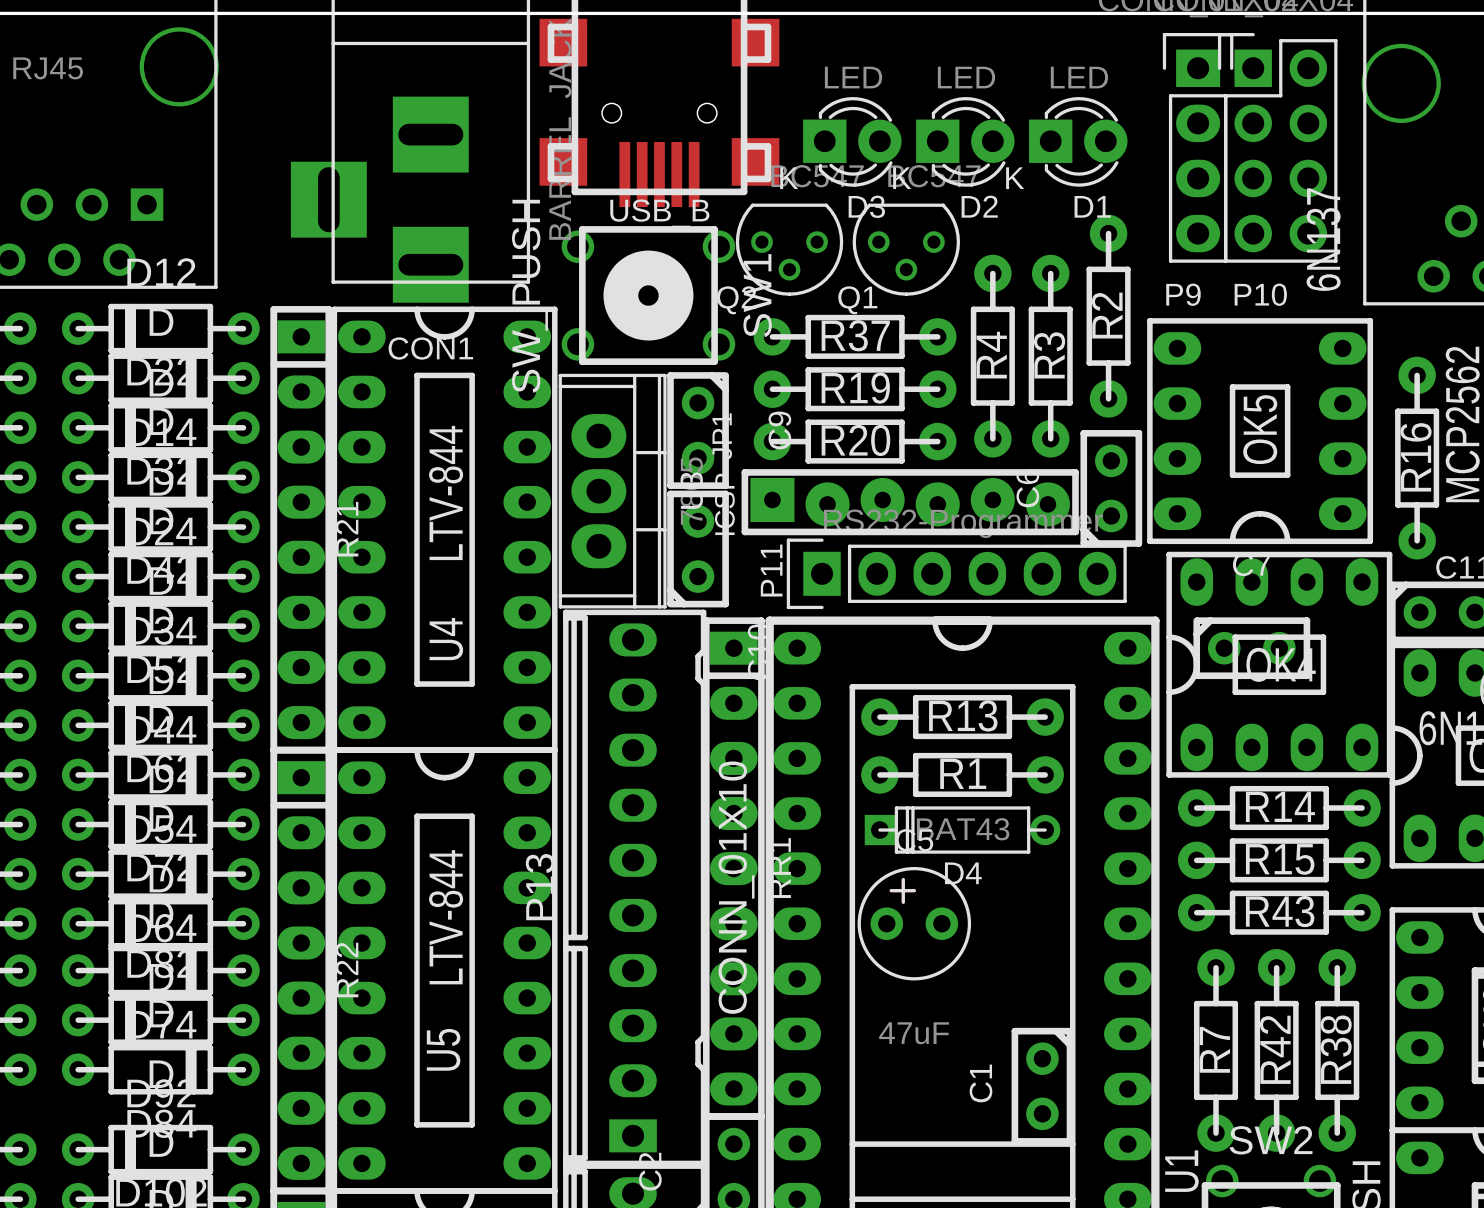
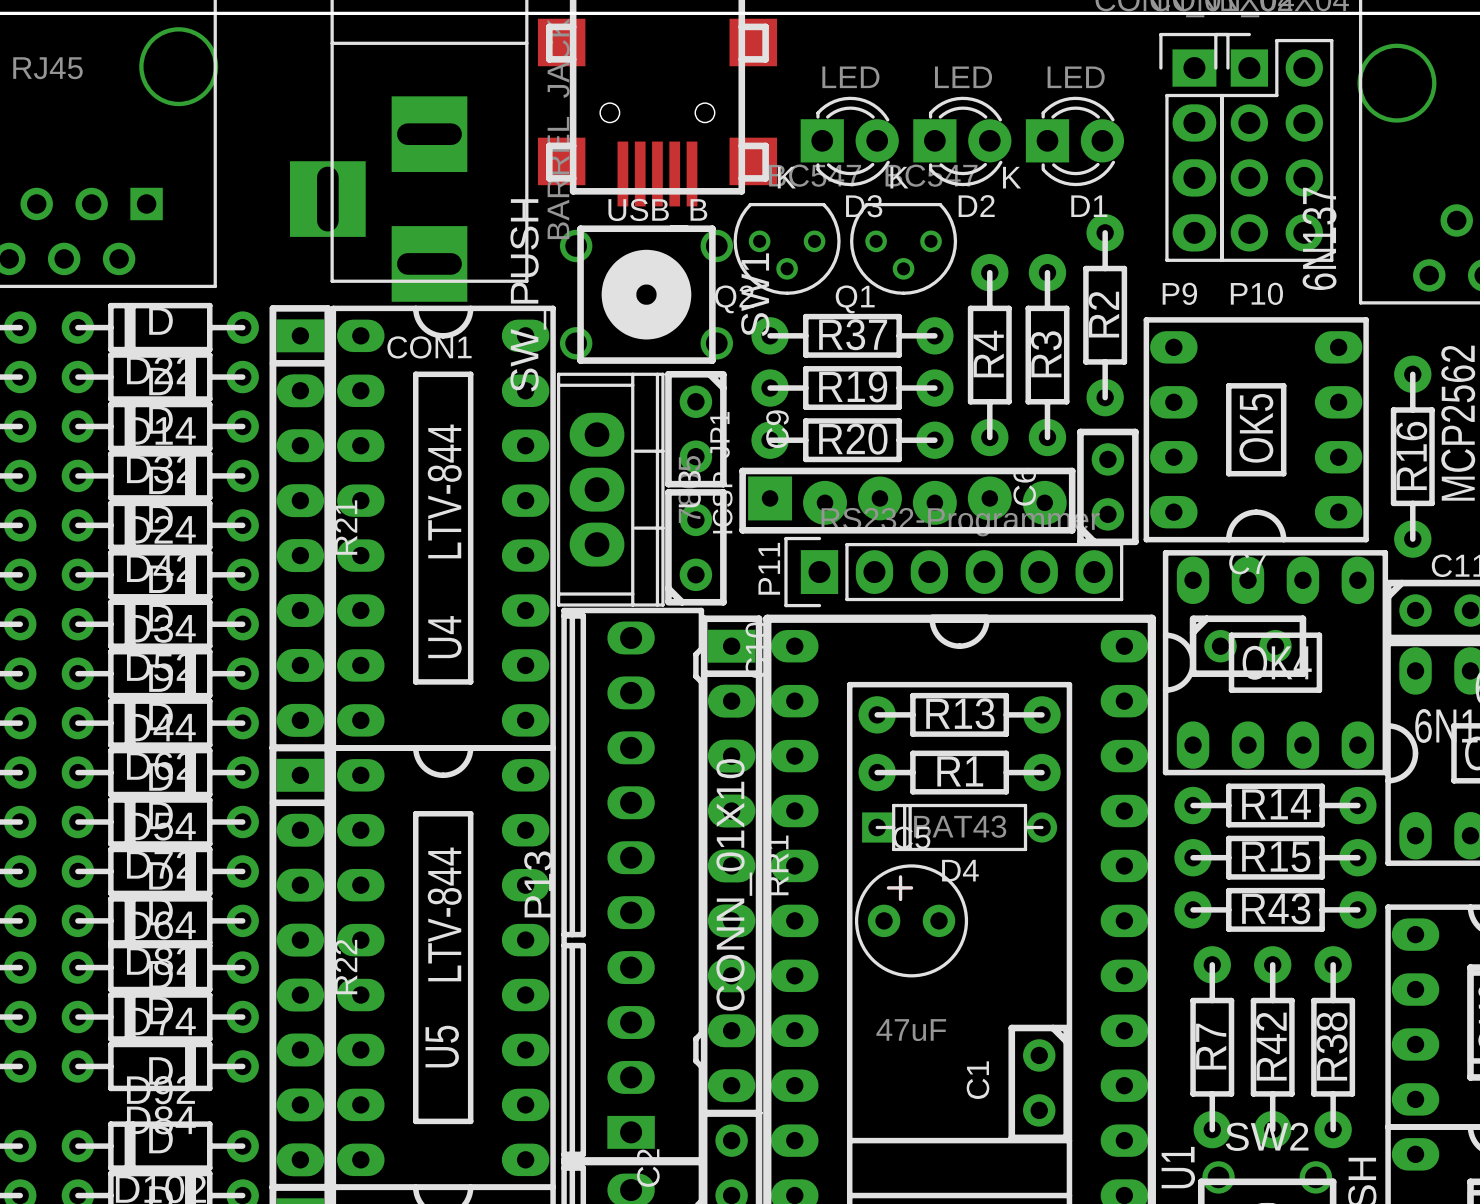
D12 name: D12 (161, 272) -> none

